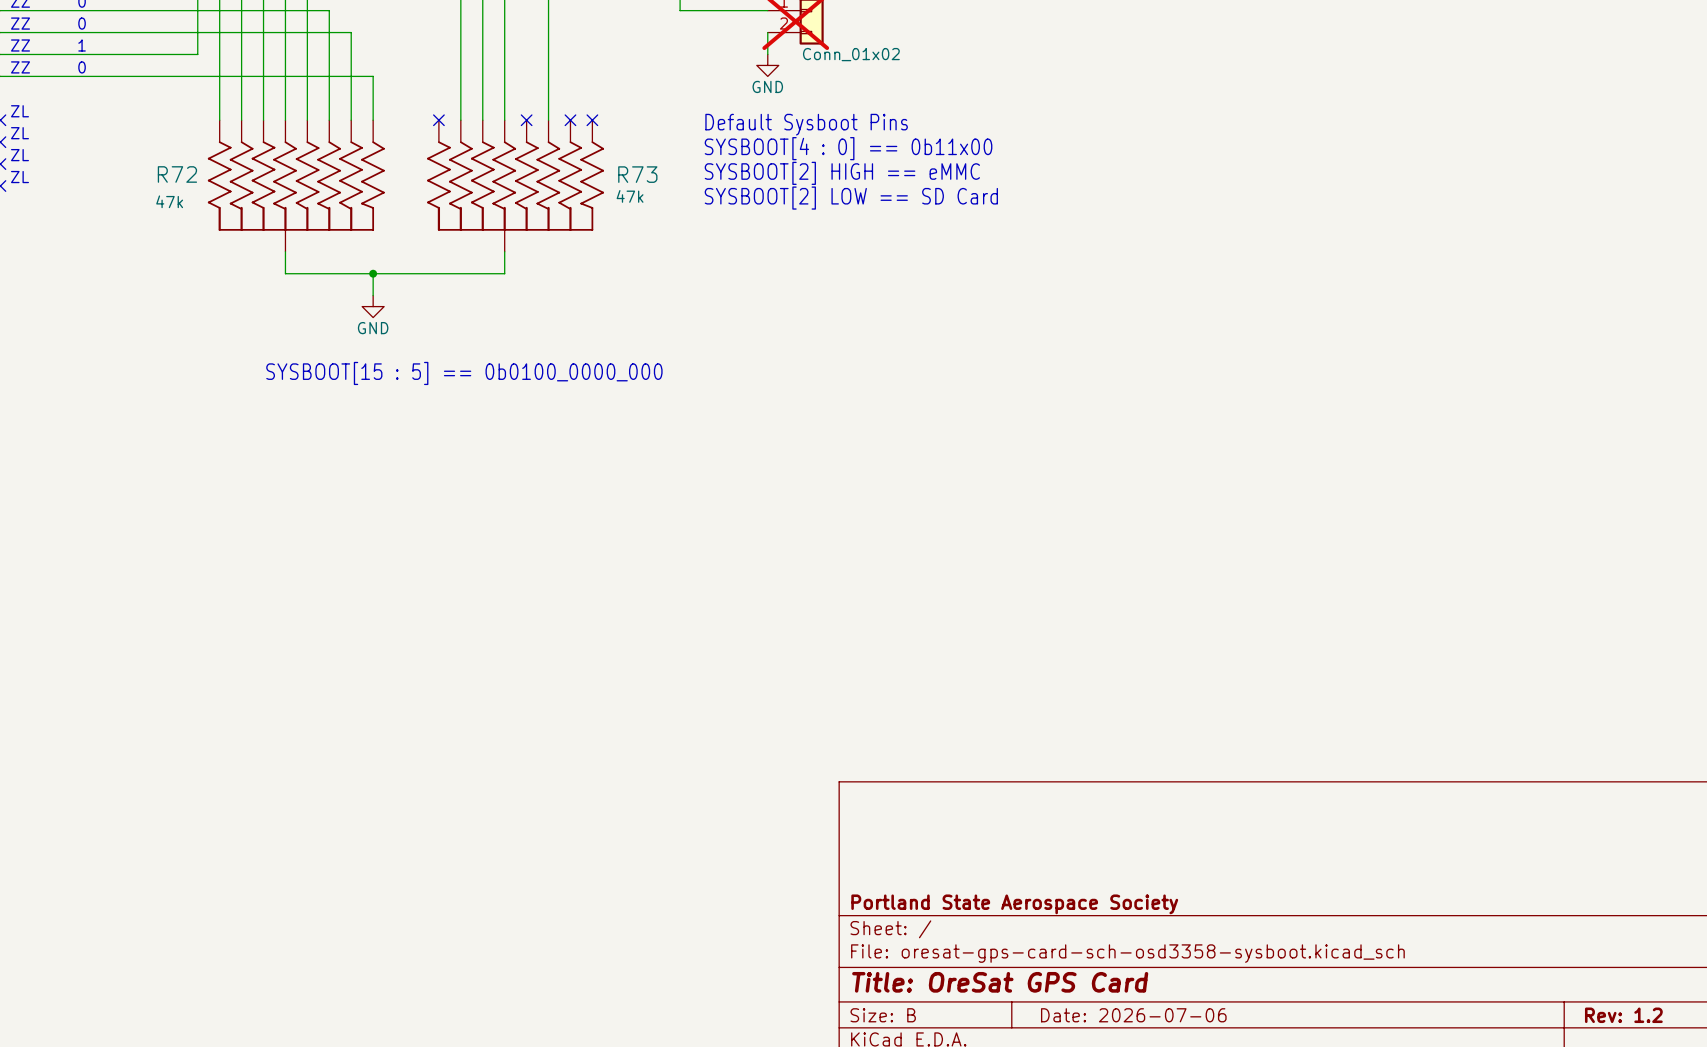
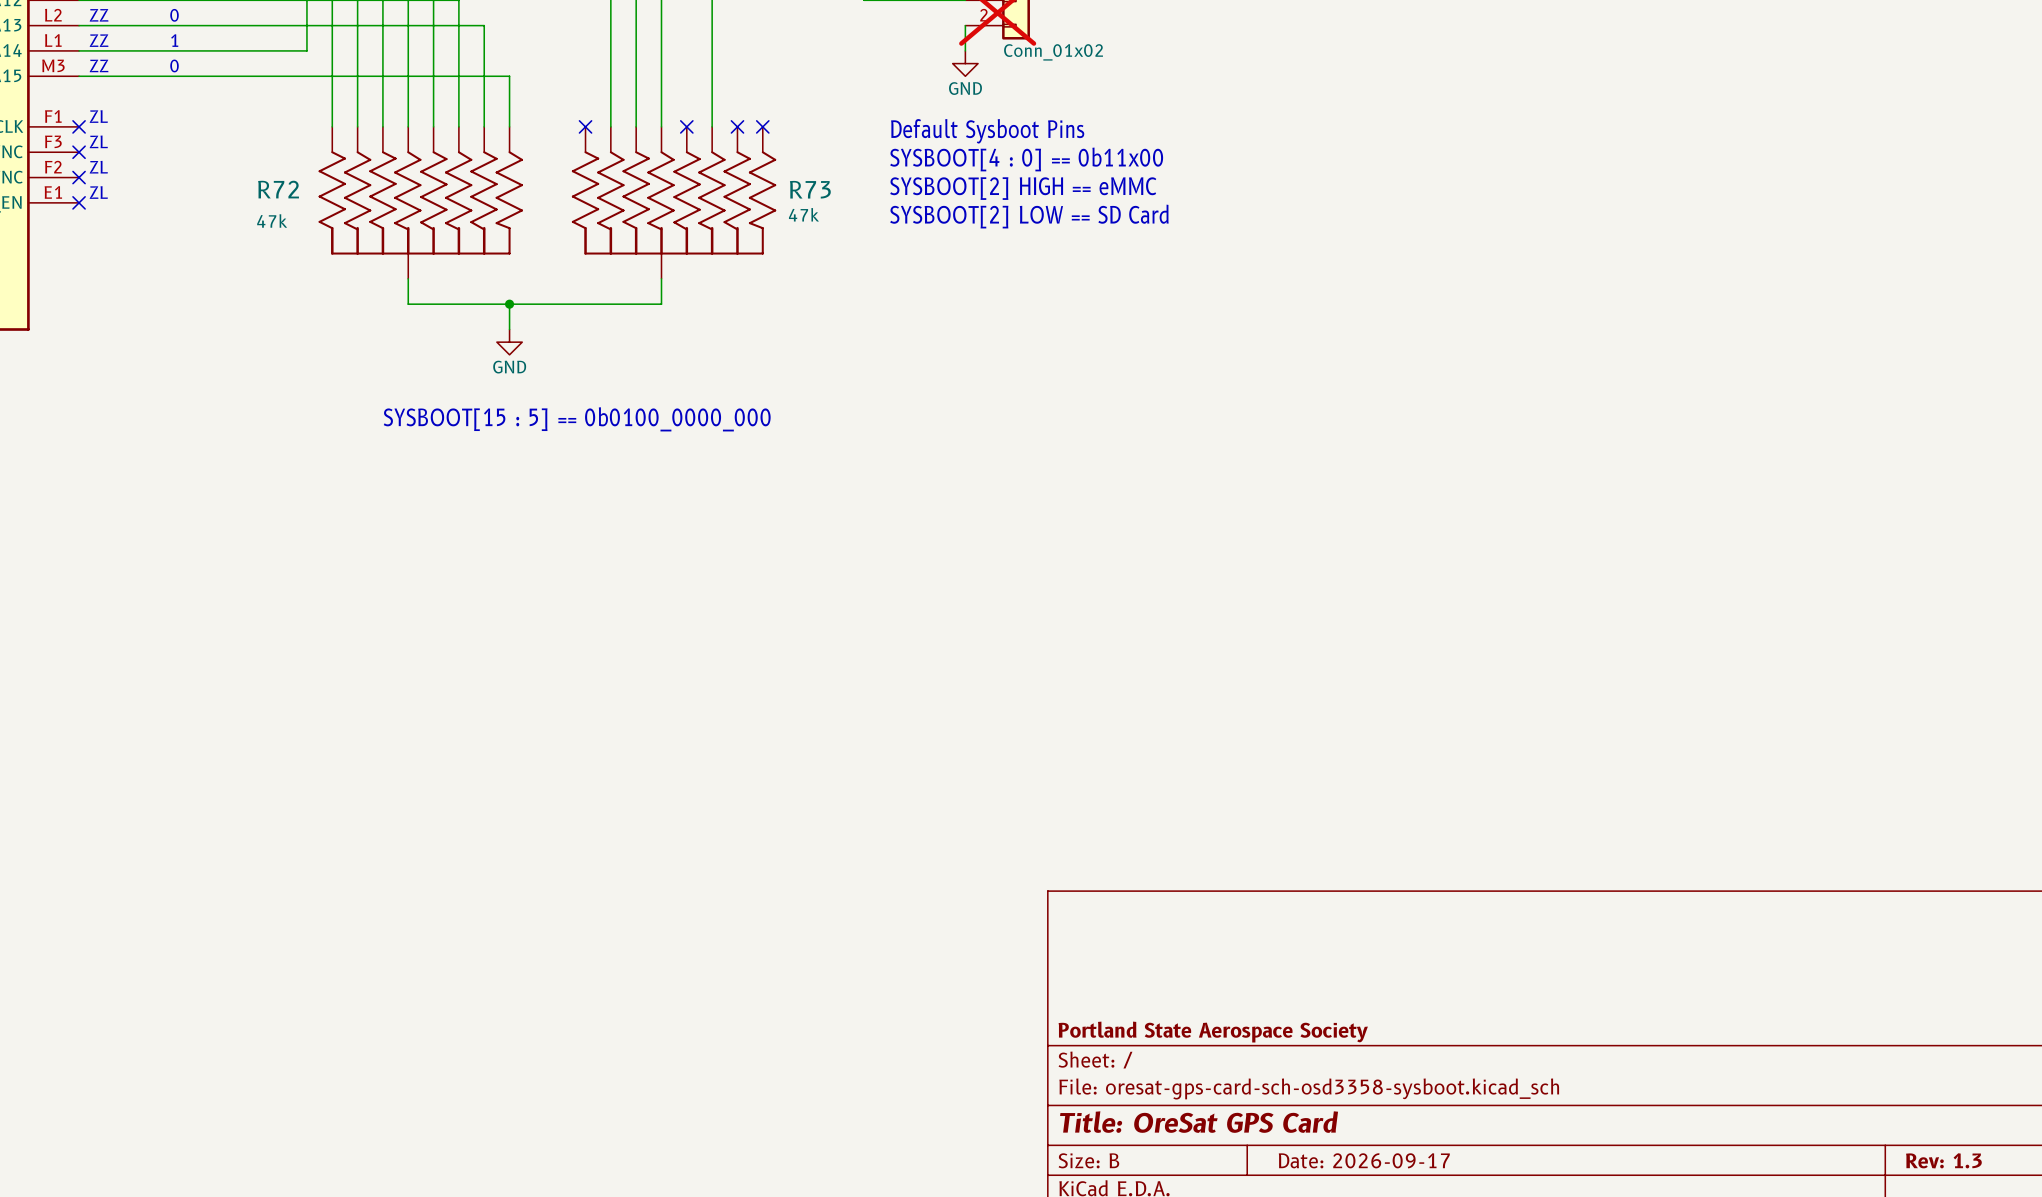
title block: Date: 2026-07-06 (1133, 1015) -> Date: 2026-09-17 (1364, 1160)
title block: Rev: 1.2 (1623, 1015) -> Rev: 1.3 (1943, 1160)

